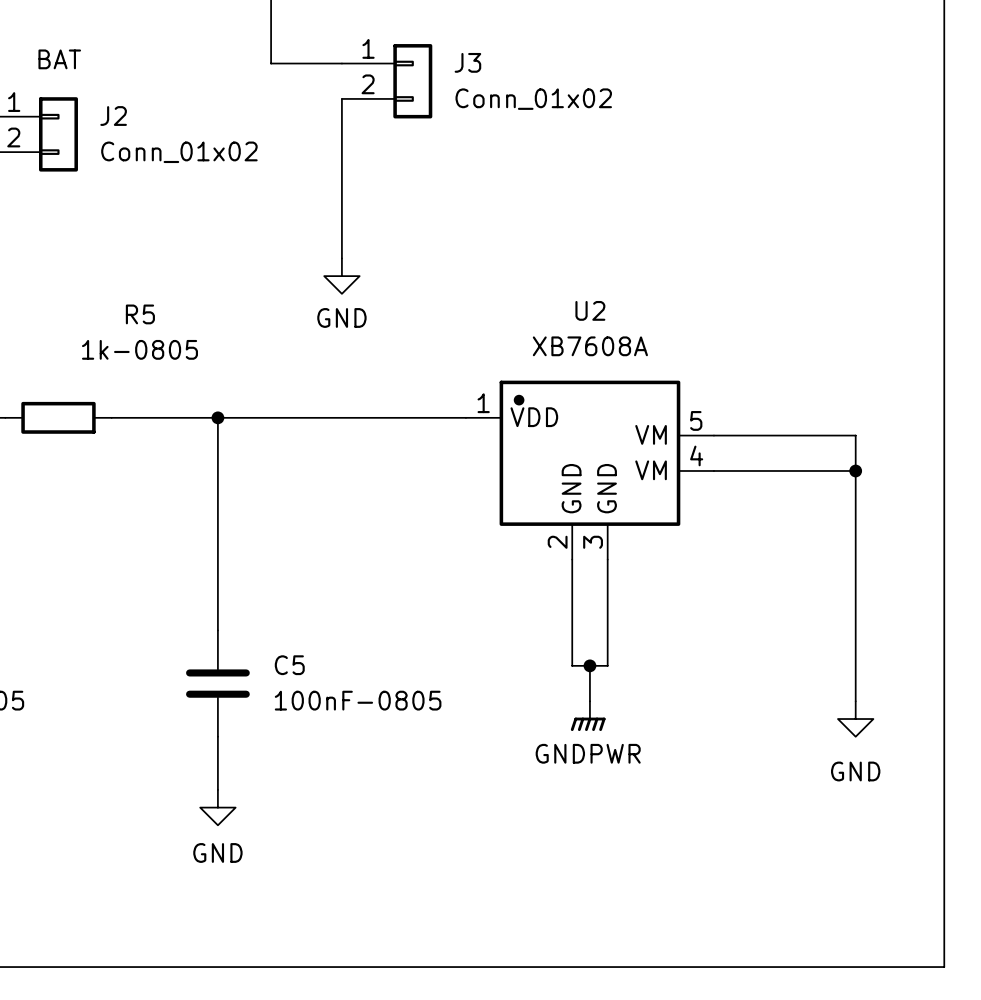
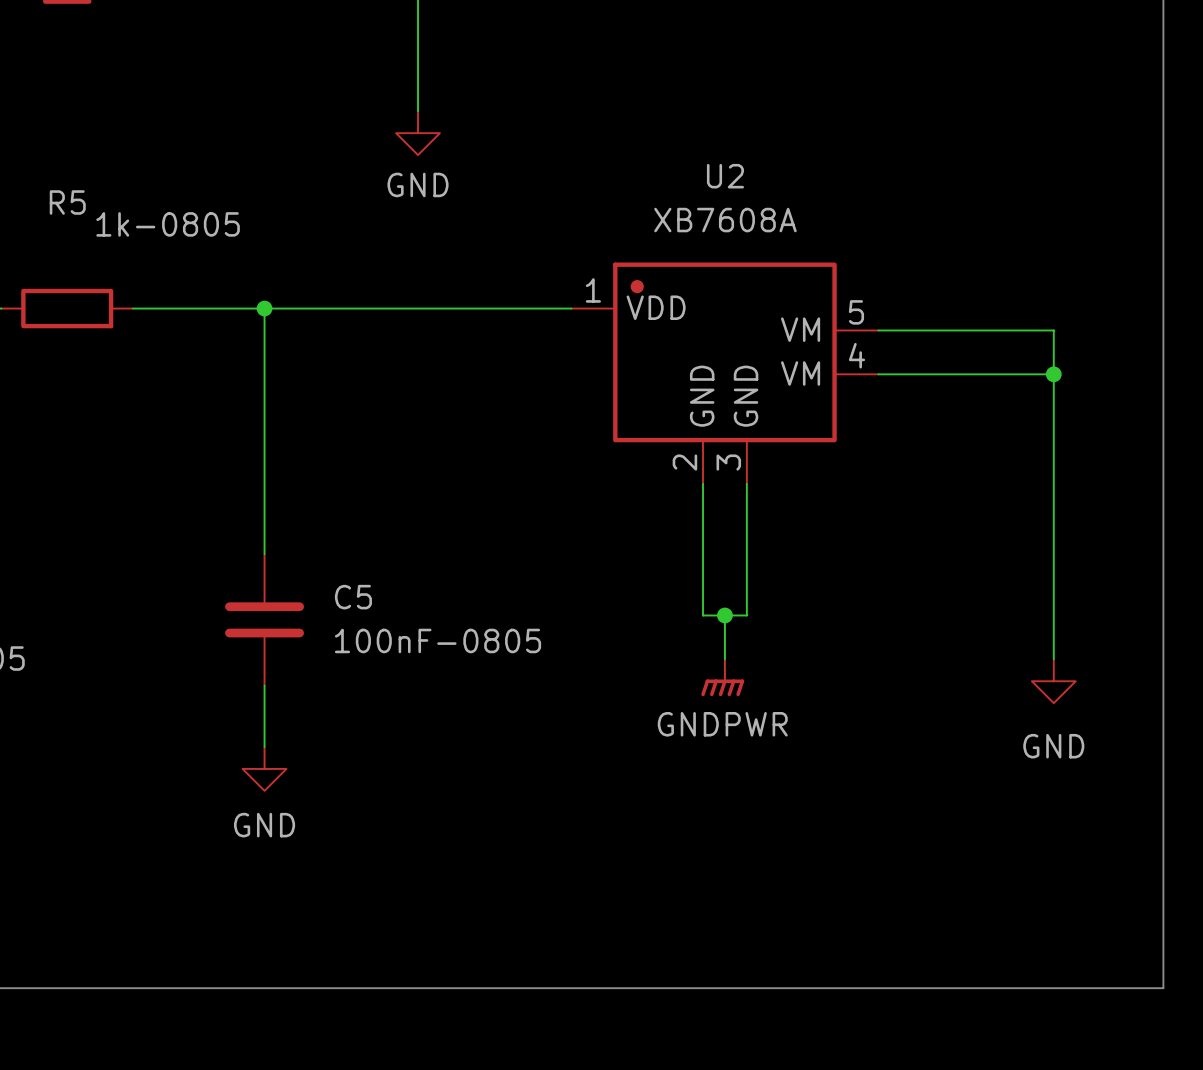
R5 name position: R5 (140, 314) -> R5 (67, 202)
C5 position: (217, 683) -> (264, 619)
power symbol position: GND (217, 807) -> GND (264, 768)

